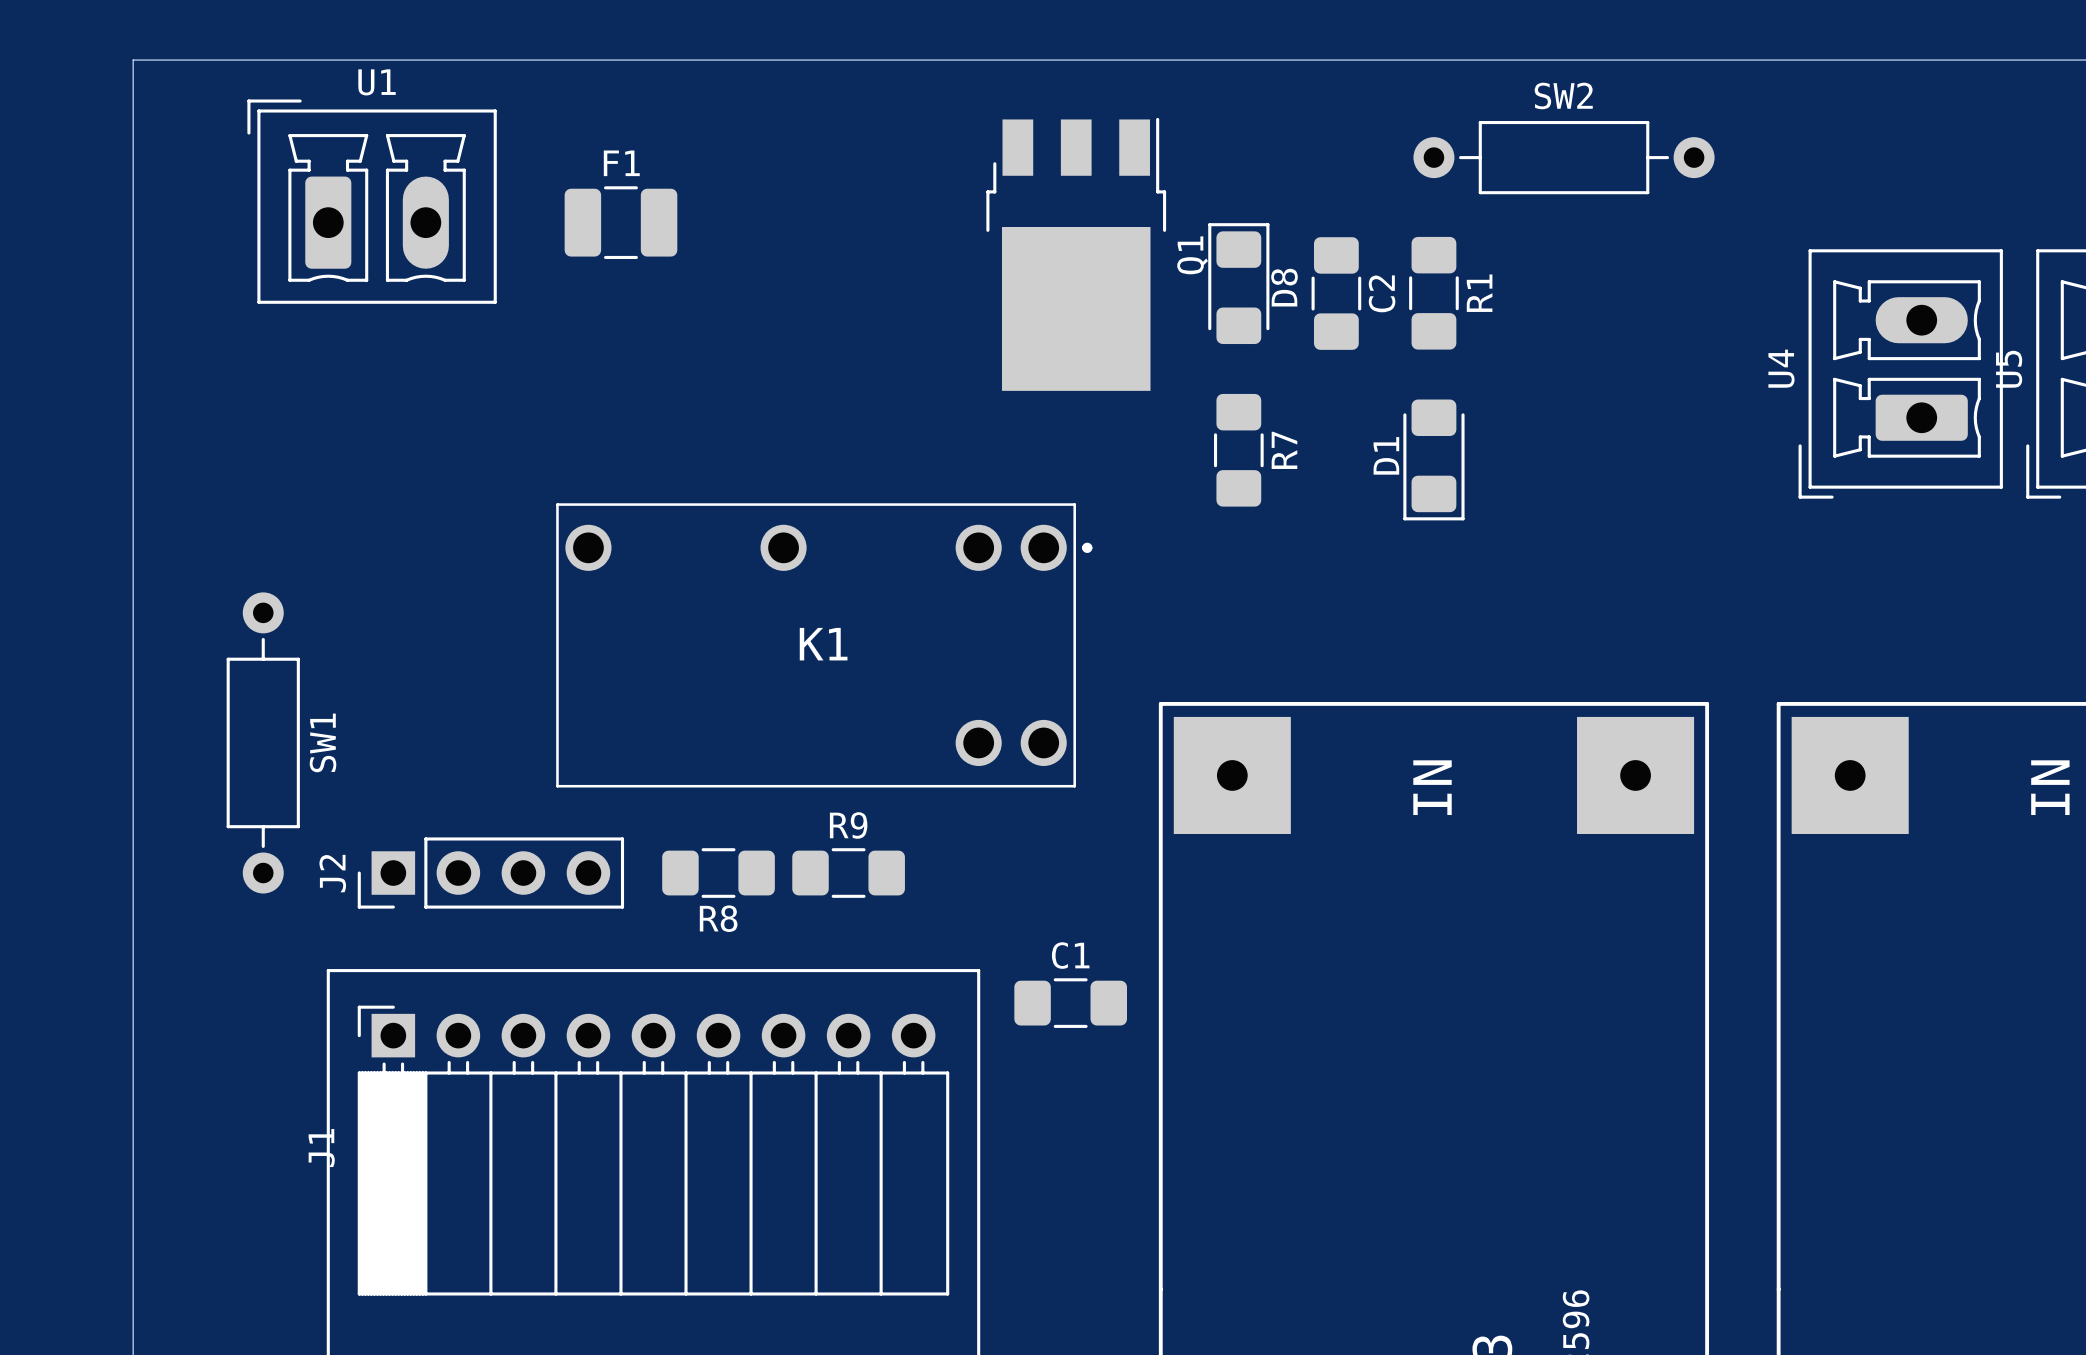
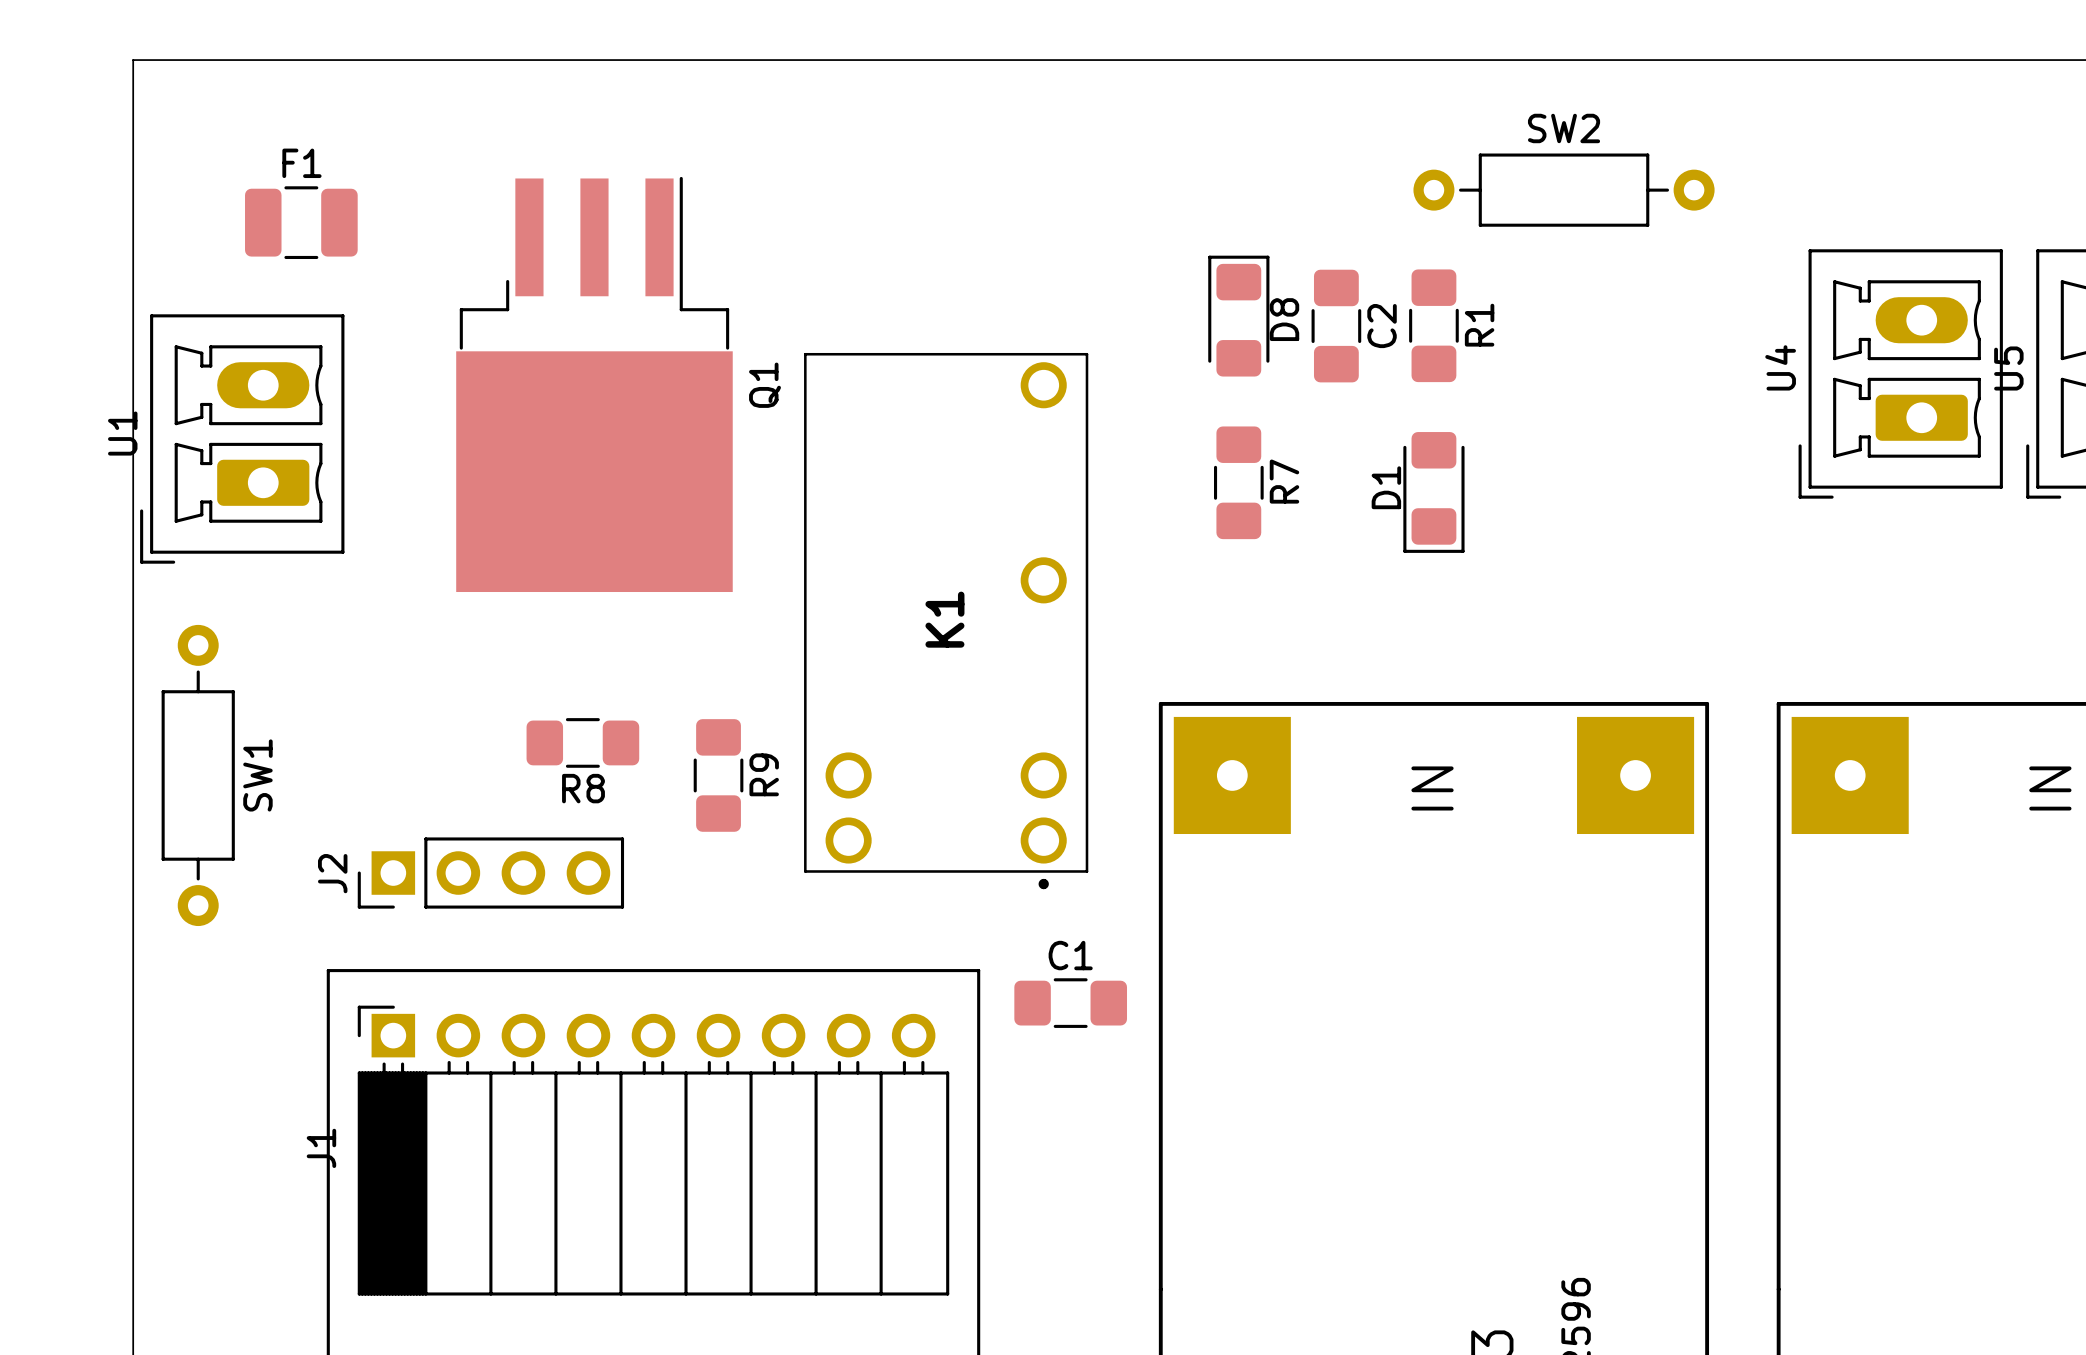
Q1 footprint: [986, 117, 1167, 391] -> [456, 176, 733, 593]
SW2 position: (1564, 157) -> (1564, 190)
U1 rotation: 0° (372, 201) -> 90° counterclockwise (242, 439)
U1 position: (372, 201) -> (242, 439)
F1 position: (620, 222) -> (301, 222)
Q1 name position: Q1 (1192, 255) -> Q1 (765, 385)
D8 position: (1238, 283) -> (1238, 316)
C2 position: (1336, 293) -> (1336, 326)
R1 position: (1433, 293) -> (1433, 325)
R7 position: (1238, 450) -> (1238, 482)
D1 position: (1433, 459) -> (1433, 492)
K1 rotation: 0° (824, 645) -> 90° clockwise (946, 621)
SW1 position: (263, 742) -> (198, 775)
R8 position: (718, 873) -> (582, 742)
R9 rotation: 0° (848, 873) -> 90° clockwise (718, 775)
R9 position: (848, 873) -> (718, 775)

